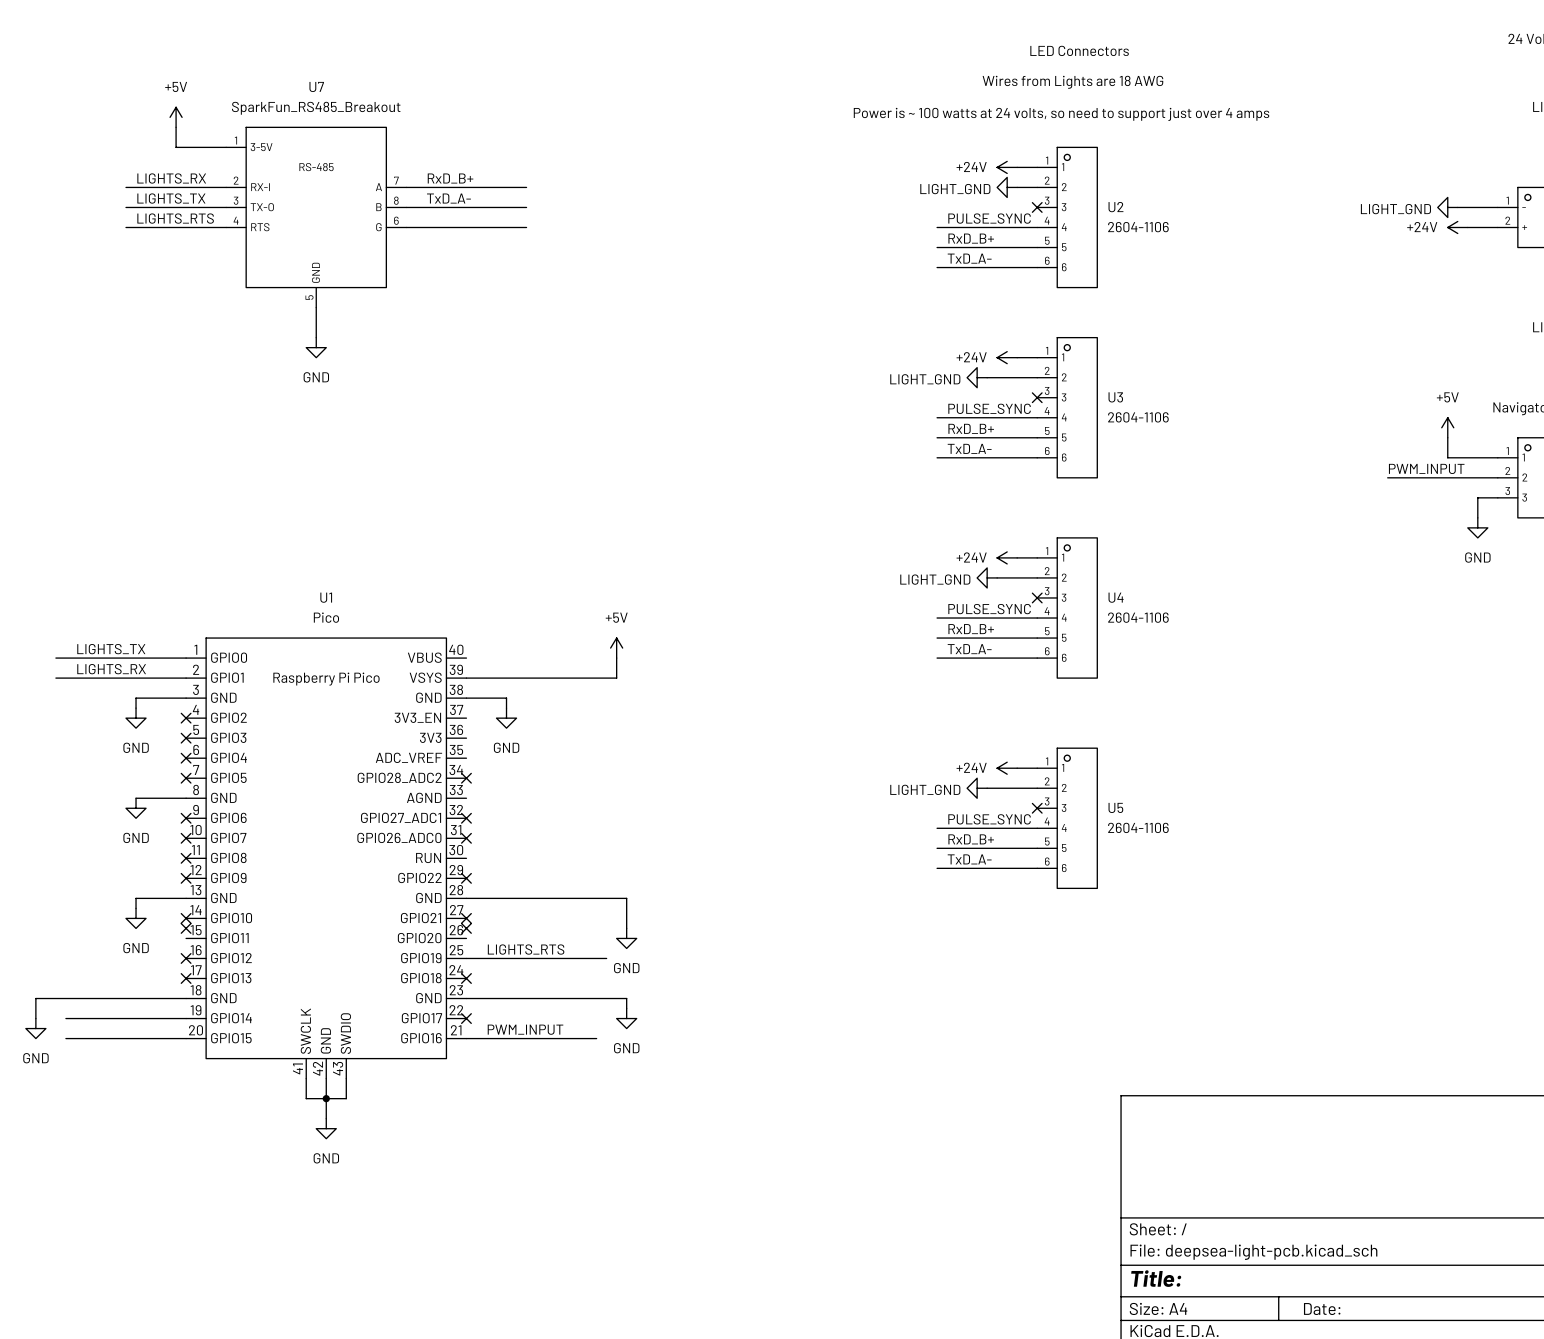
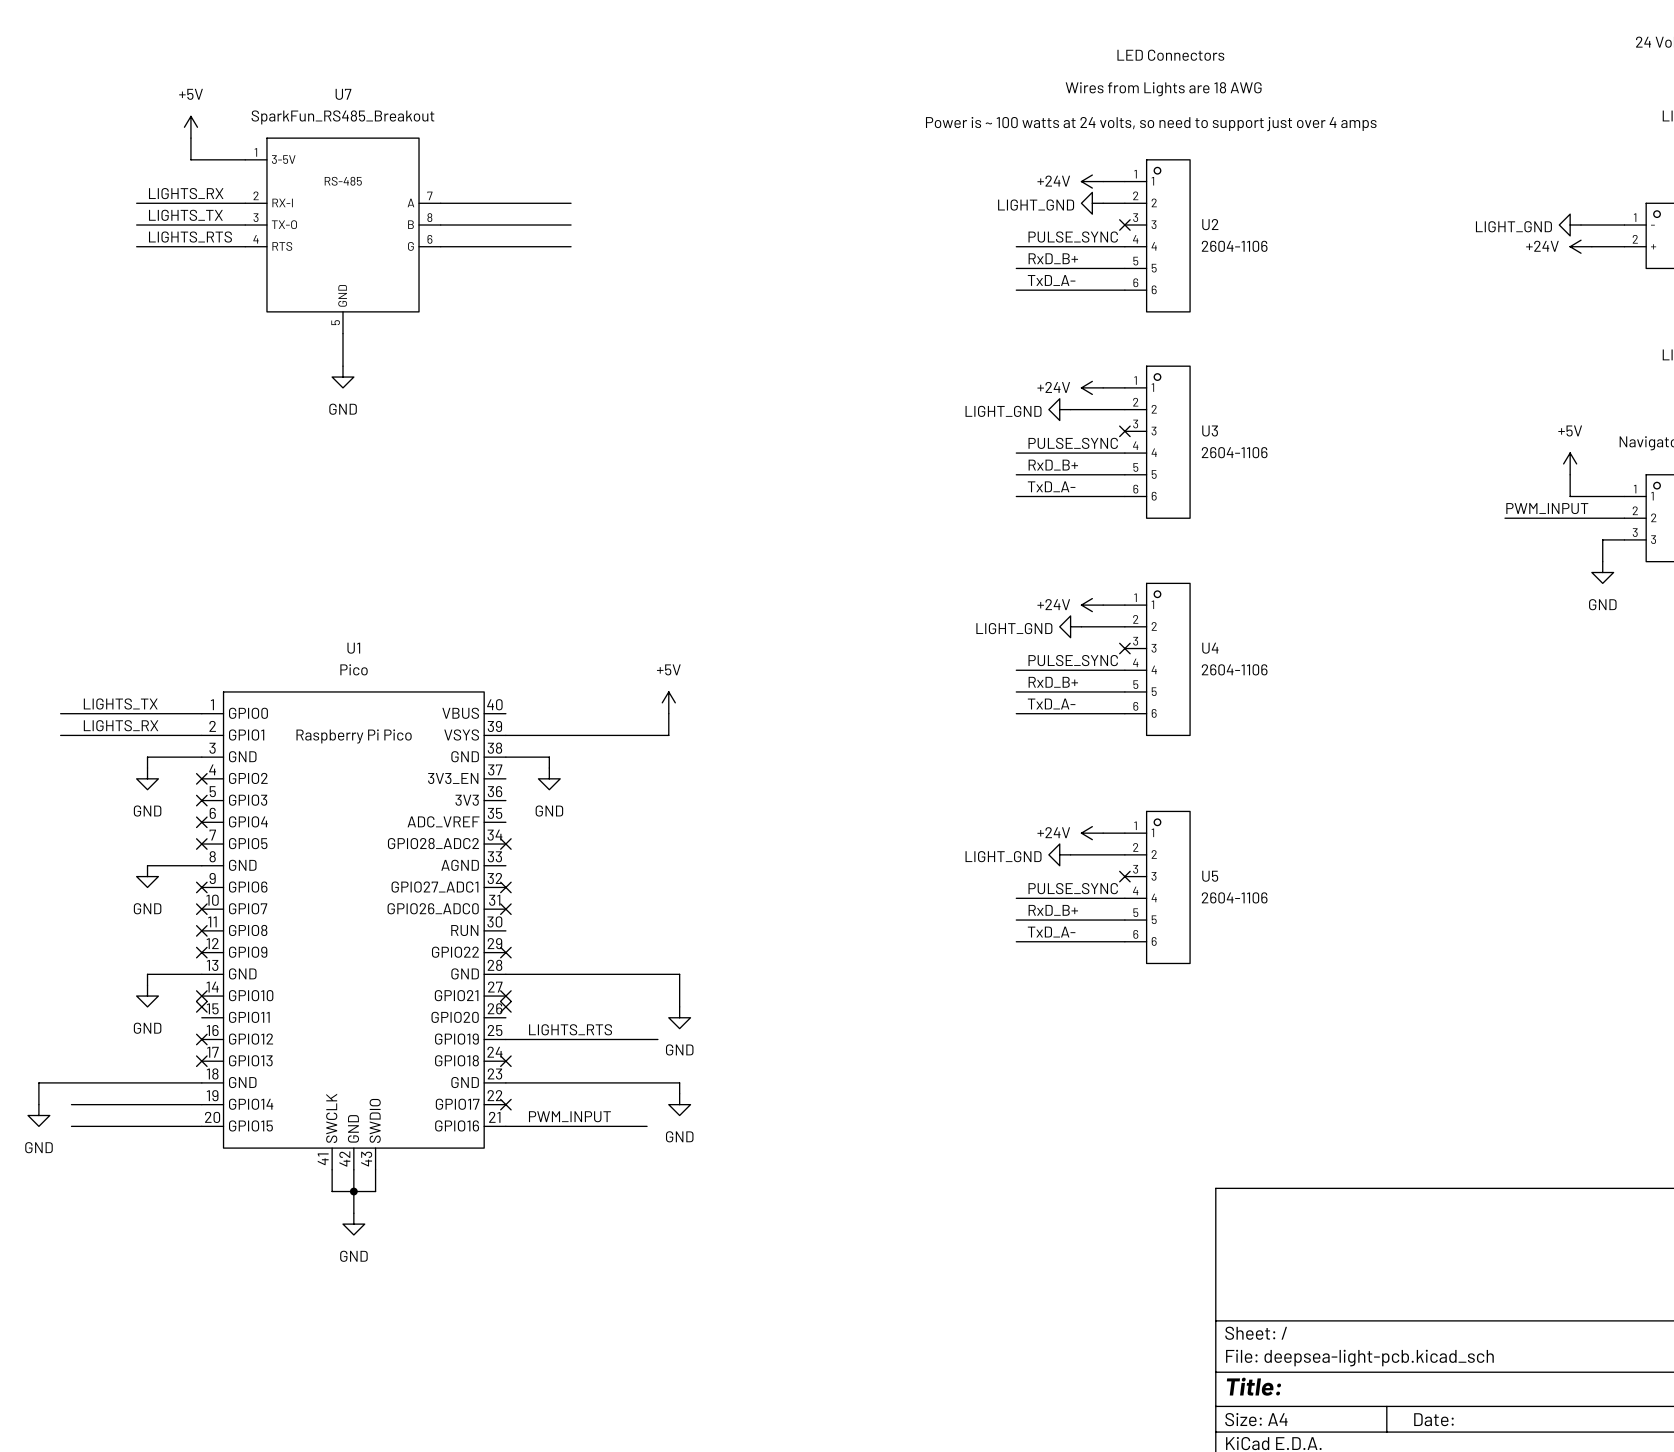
label: RxD_B+ (450, 178) -> none
label: TxD_A- (448, 198) -> none

